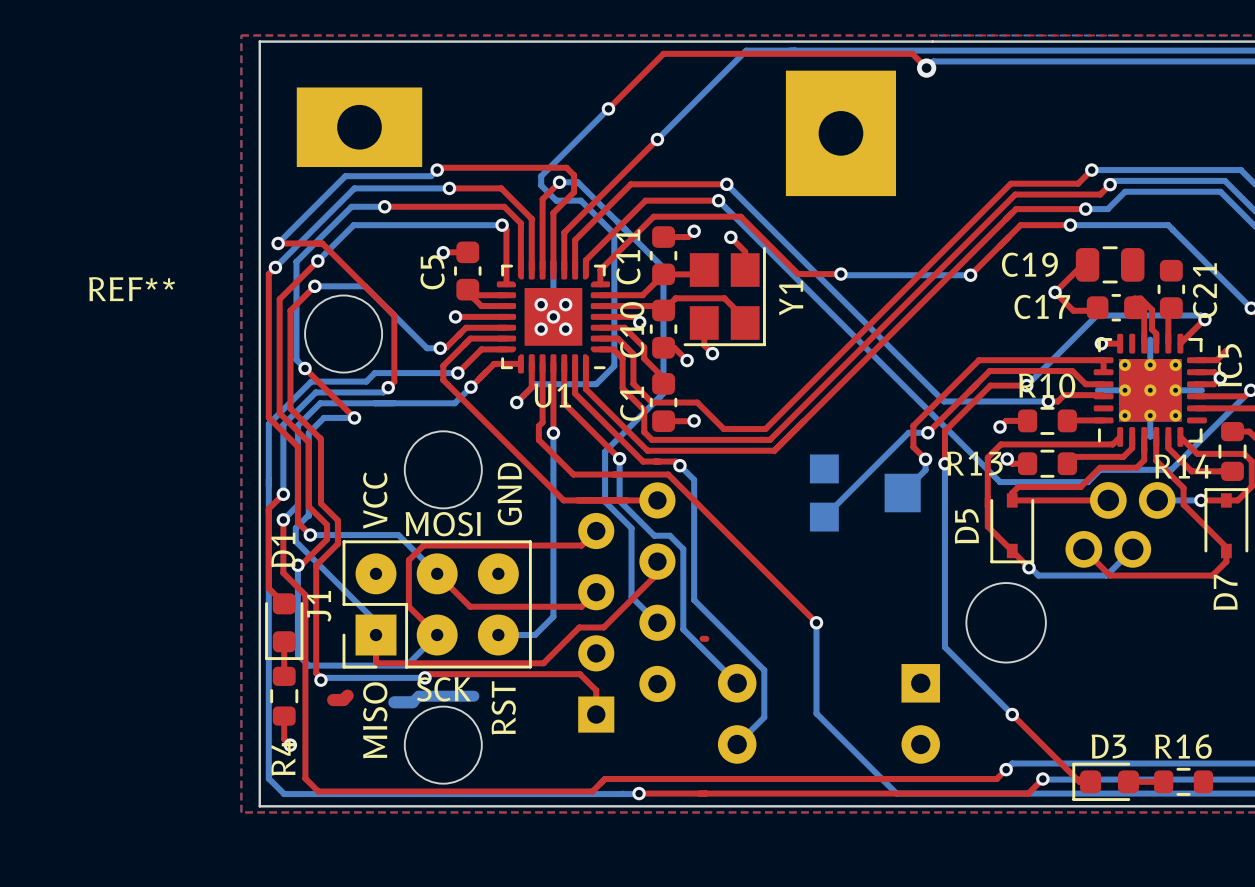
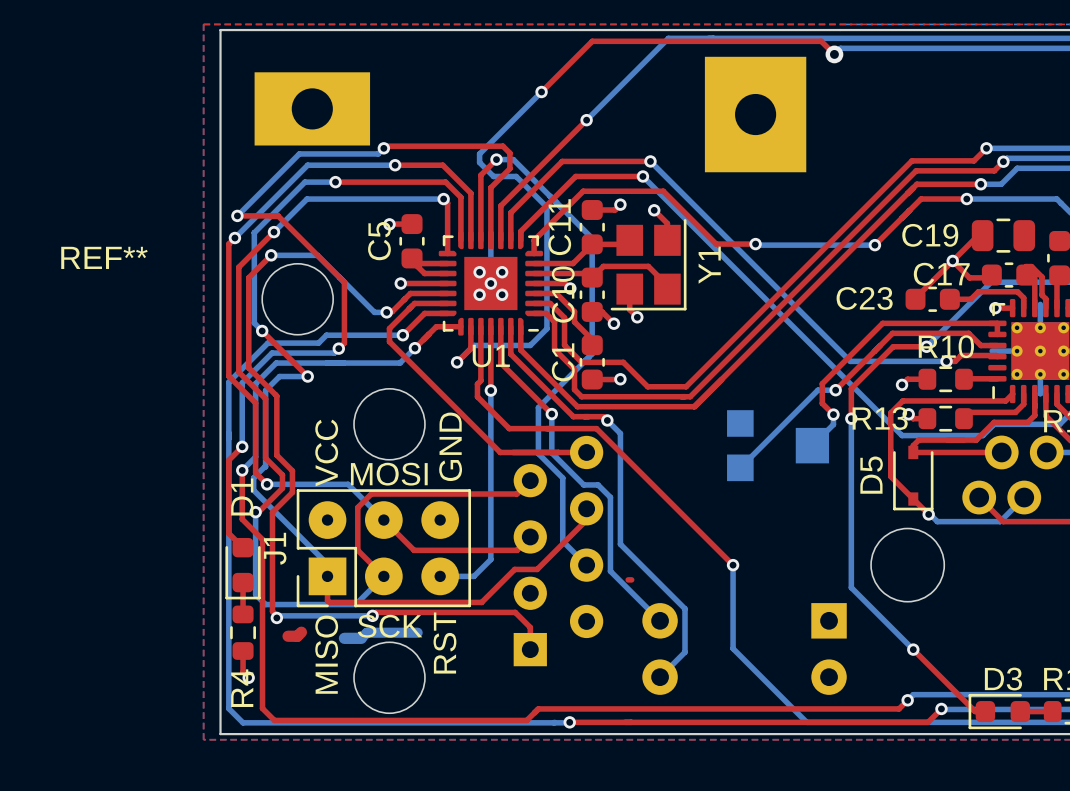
top track: none -> (952, 260) (915, 299)
C23: none -> (932, 299)
top track: none -> (949, 299) (970, 299) (978, 291) (1017, 291) (1023, 297) (1023, 308)

